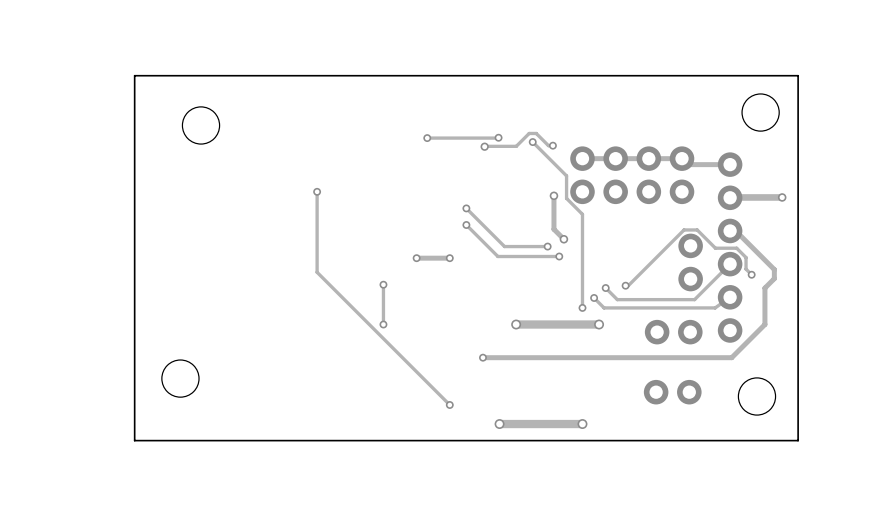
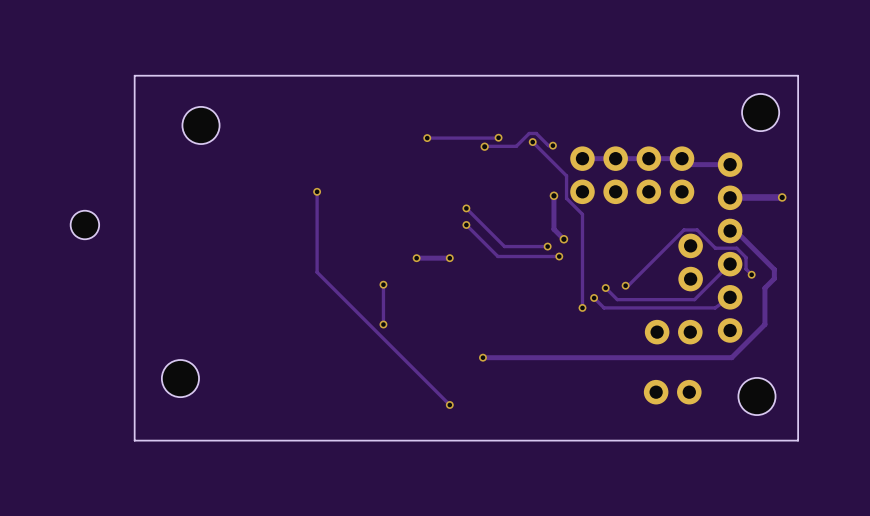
hole: none -> (84, 224)
via: (516, 324) -> none
track: (599, 324) (516, 324) -> none
via: (599, 324) -> none
via: (499, 424) -> none
track: (582, 424) (499, 424) -> none
via: (582, 424) -> none

